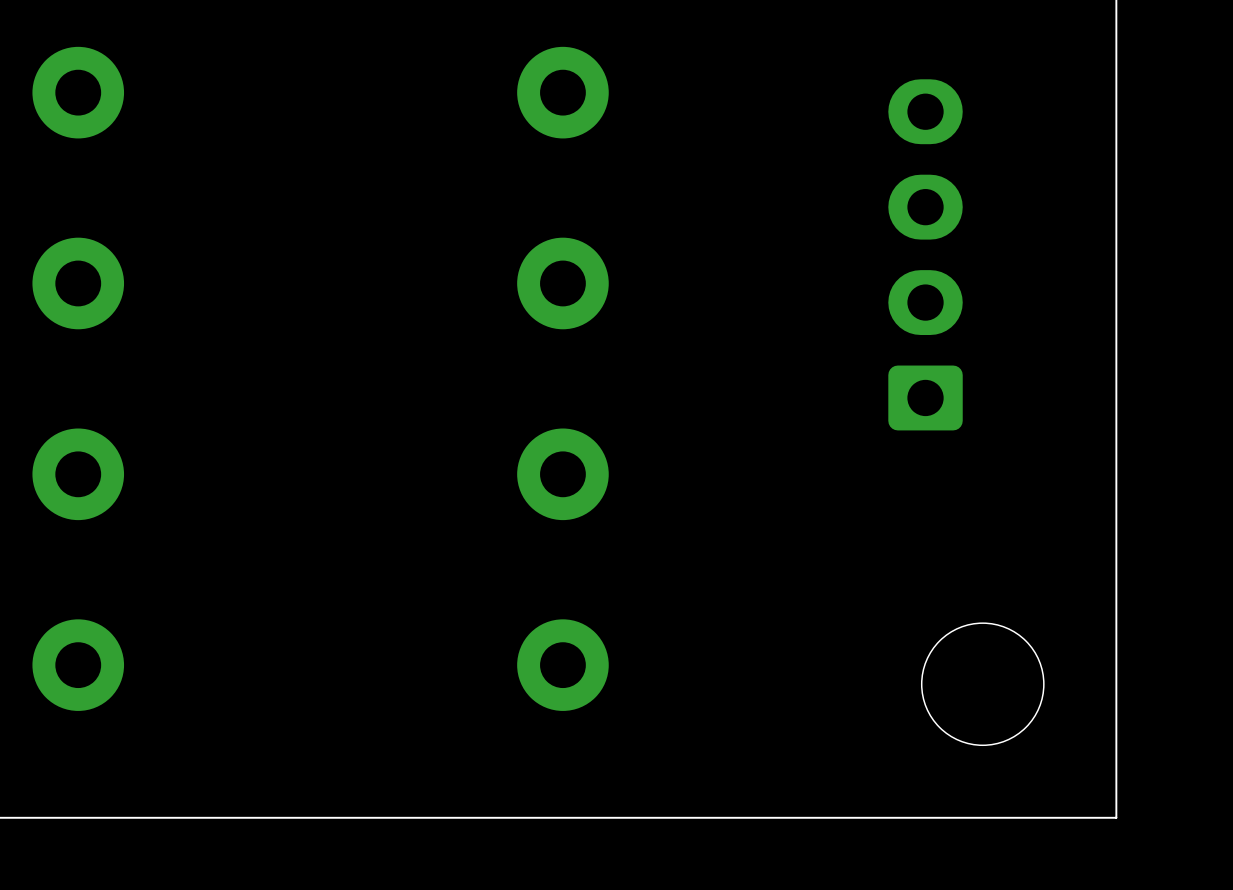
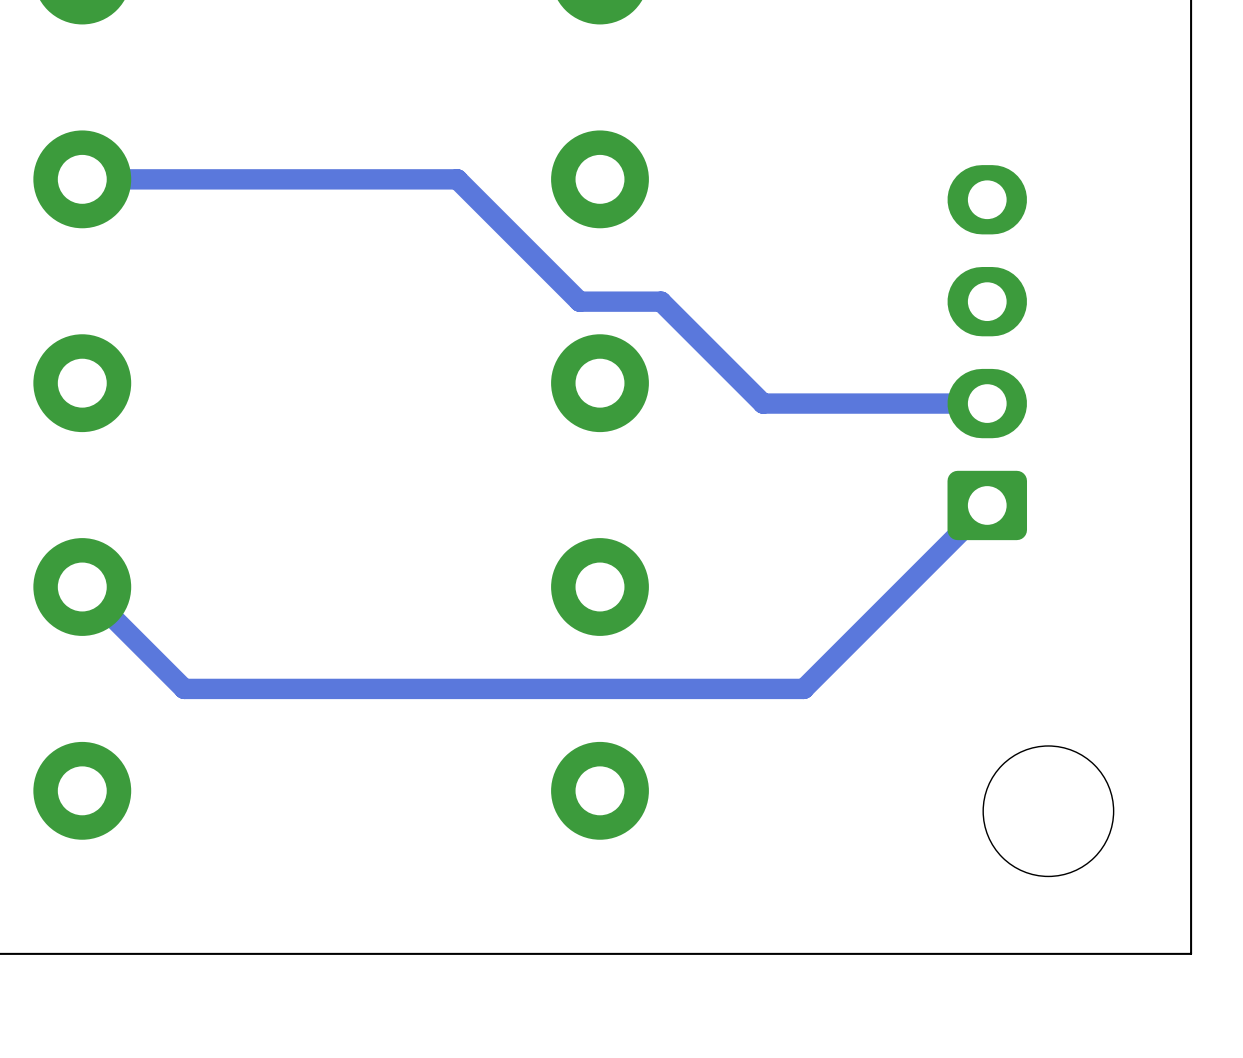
track: none -> (82, 179) (457, 179) (579, 301) (661, 301) (763, 403) (987, 403)
track: none -> (987, 505) (803, 688) (184, 688) (82, 587)

